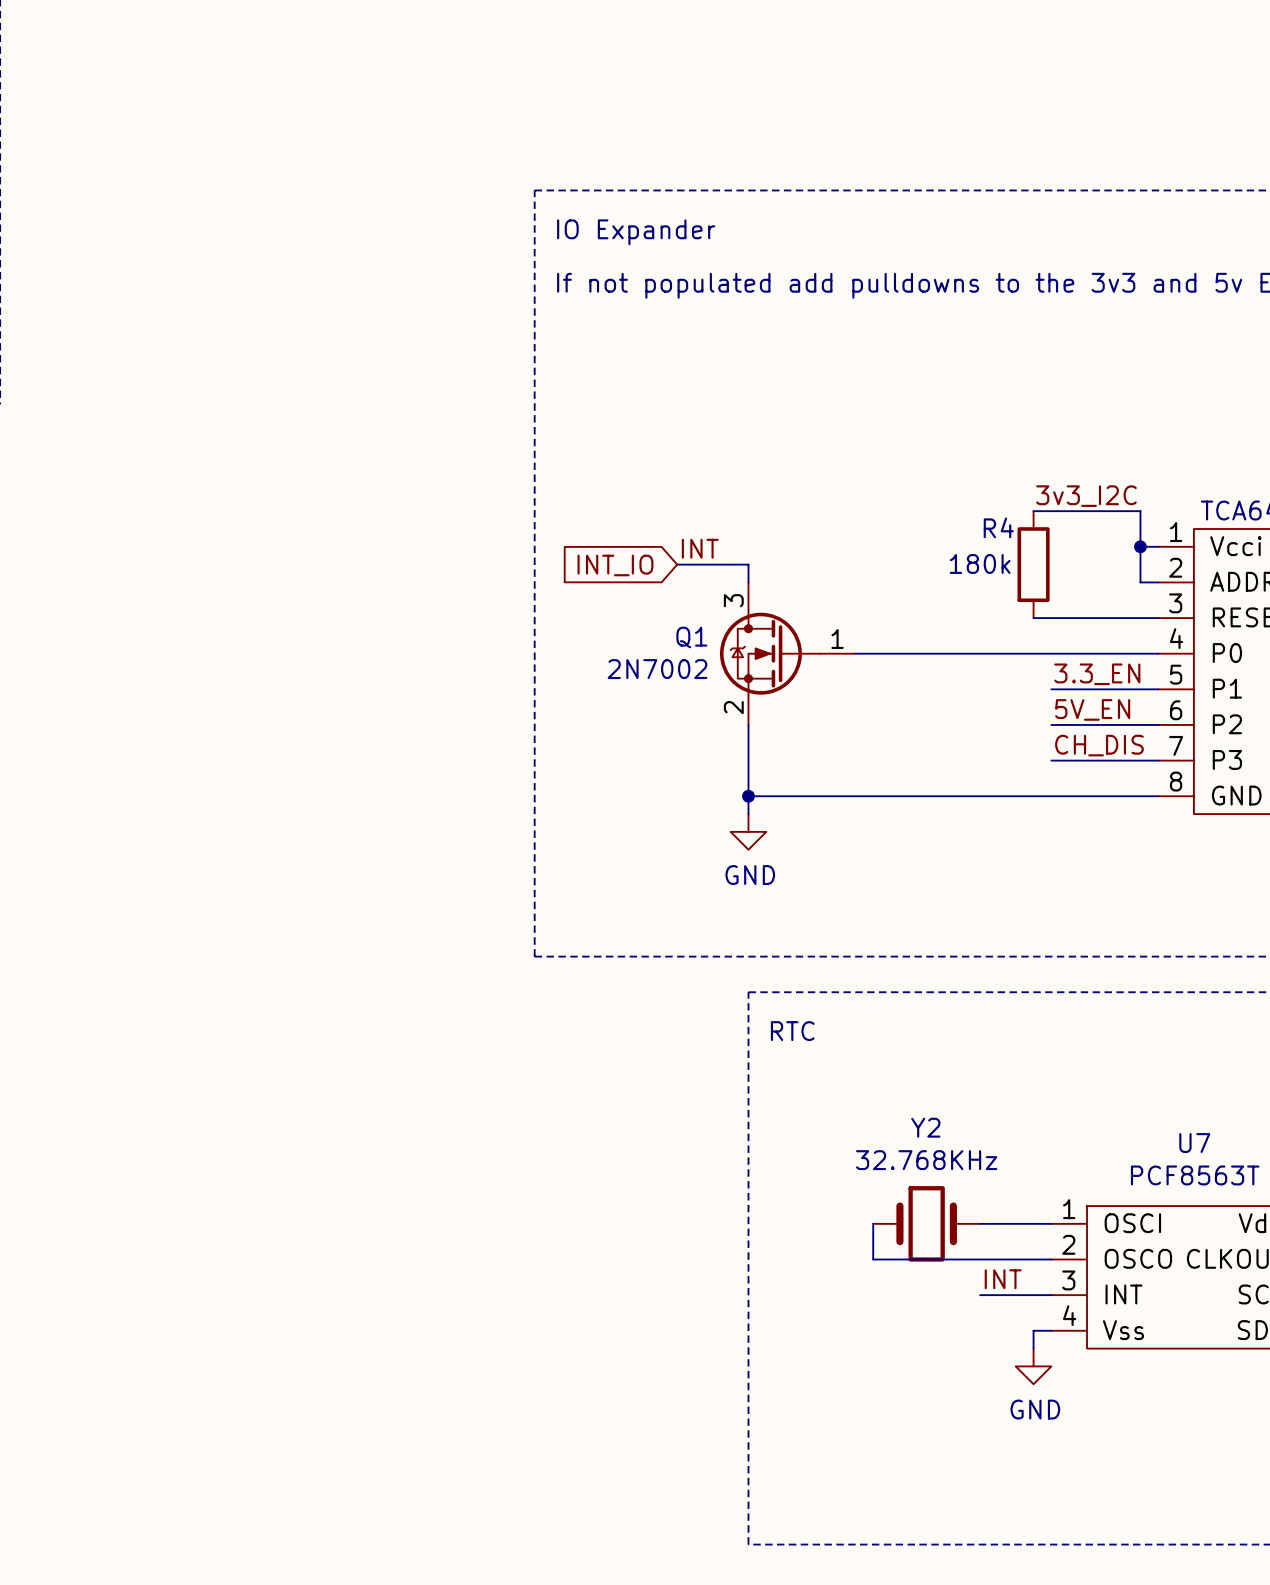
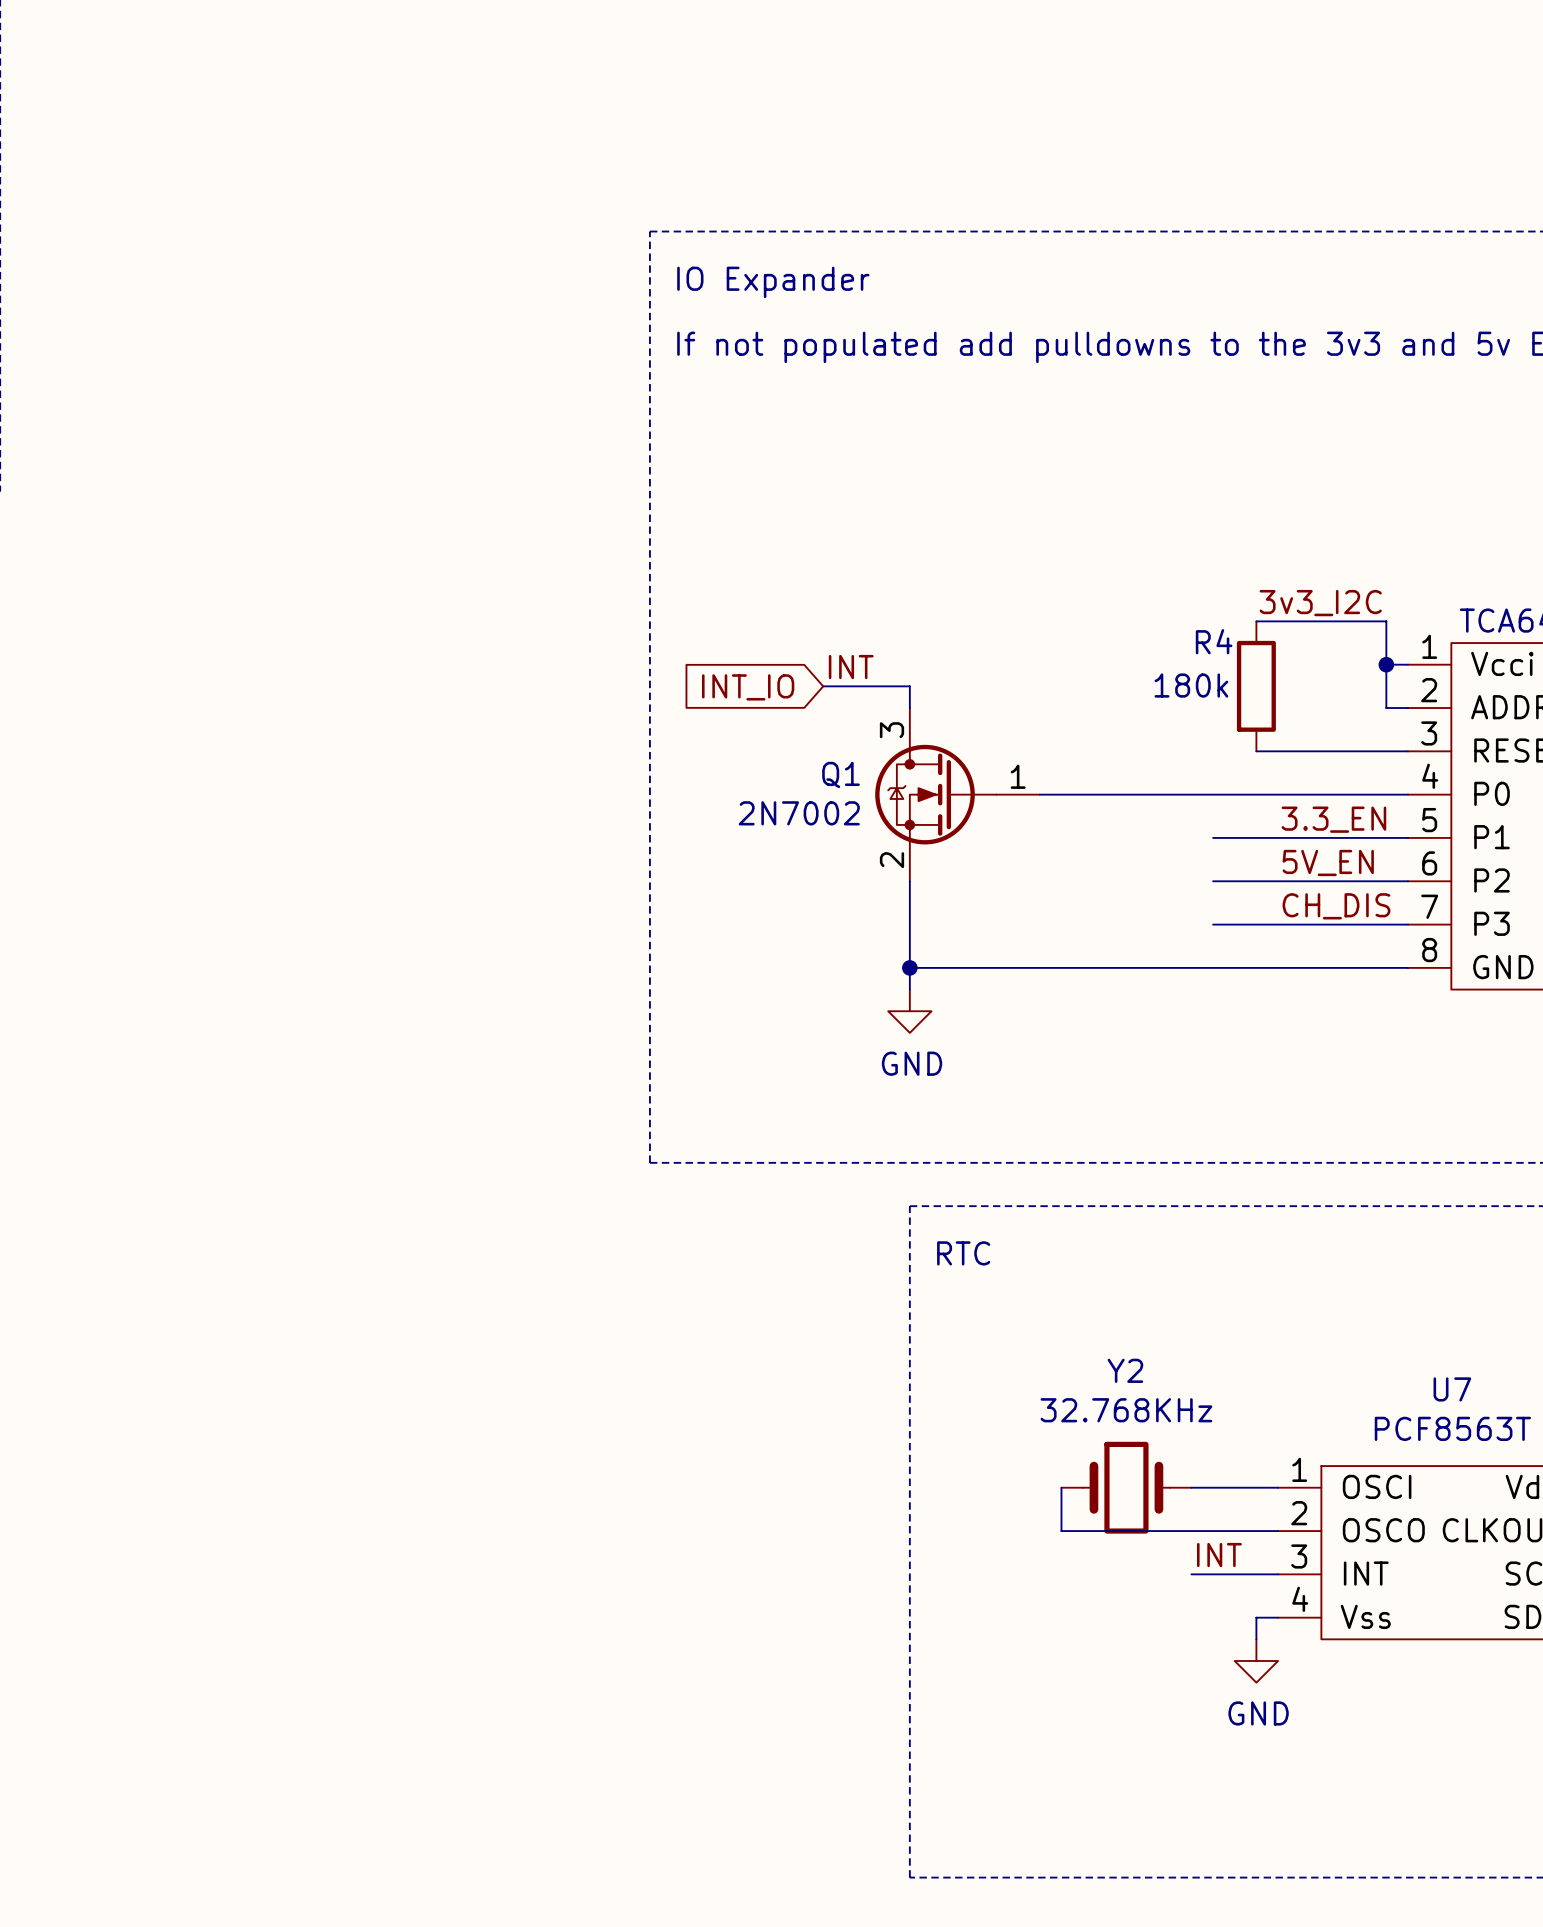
wire: none -> (1213, 837) (1278, 837)
wire: none -> (1213, 881) (1278, 881)
wire: none -> (1213, 924) (1278, 924)

